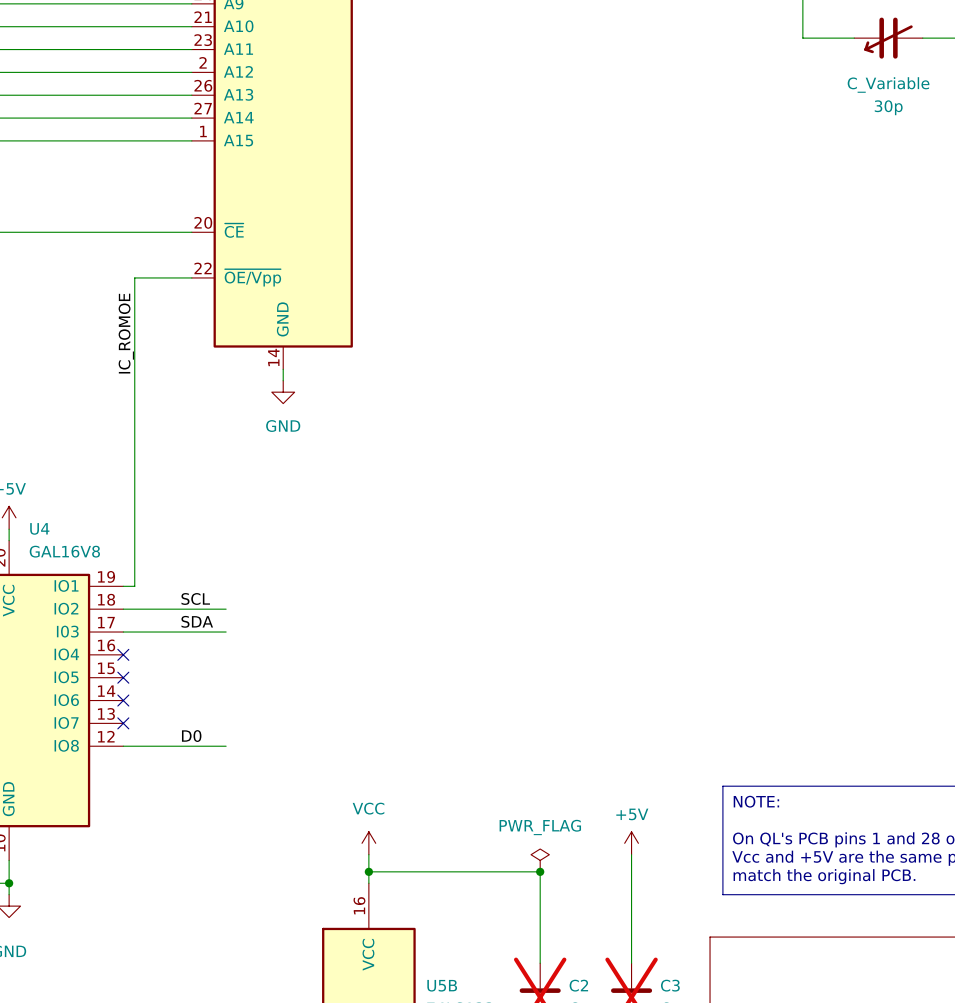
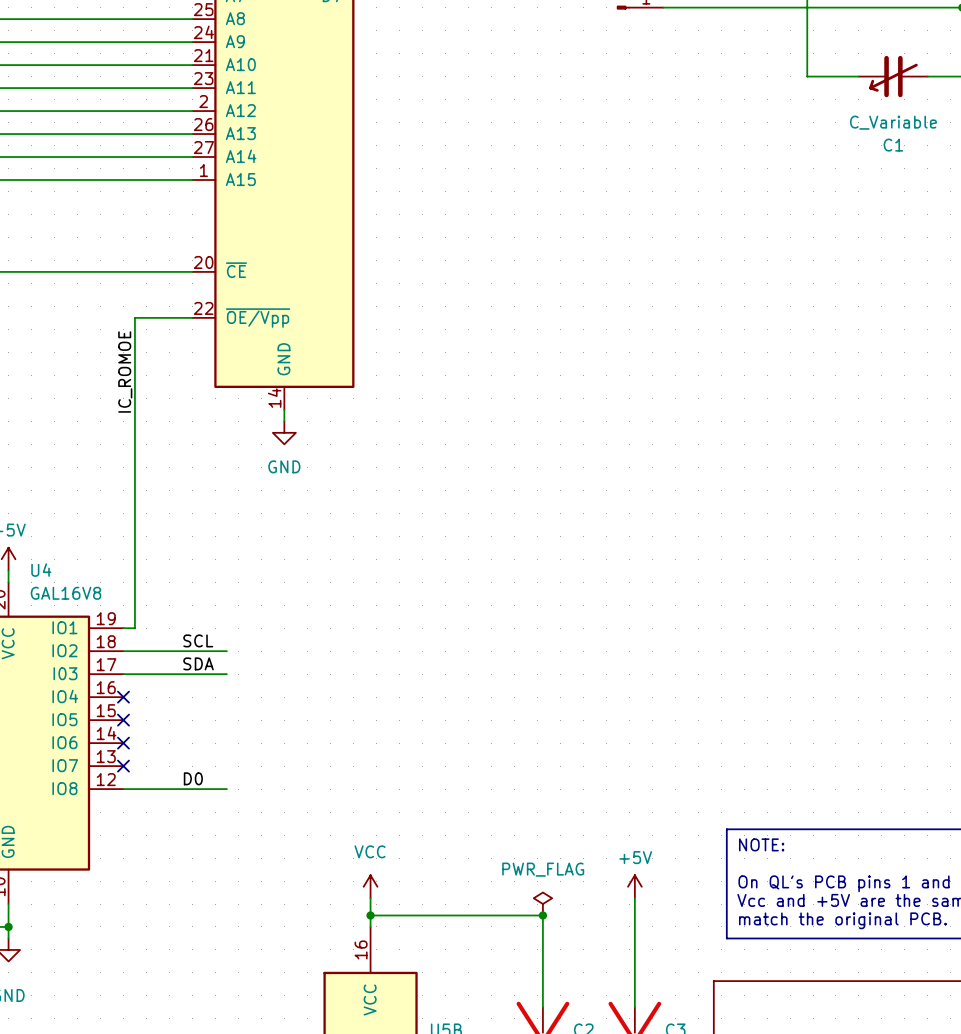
30p name: 30p (888, 107) -> C1 (893, 145)

